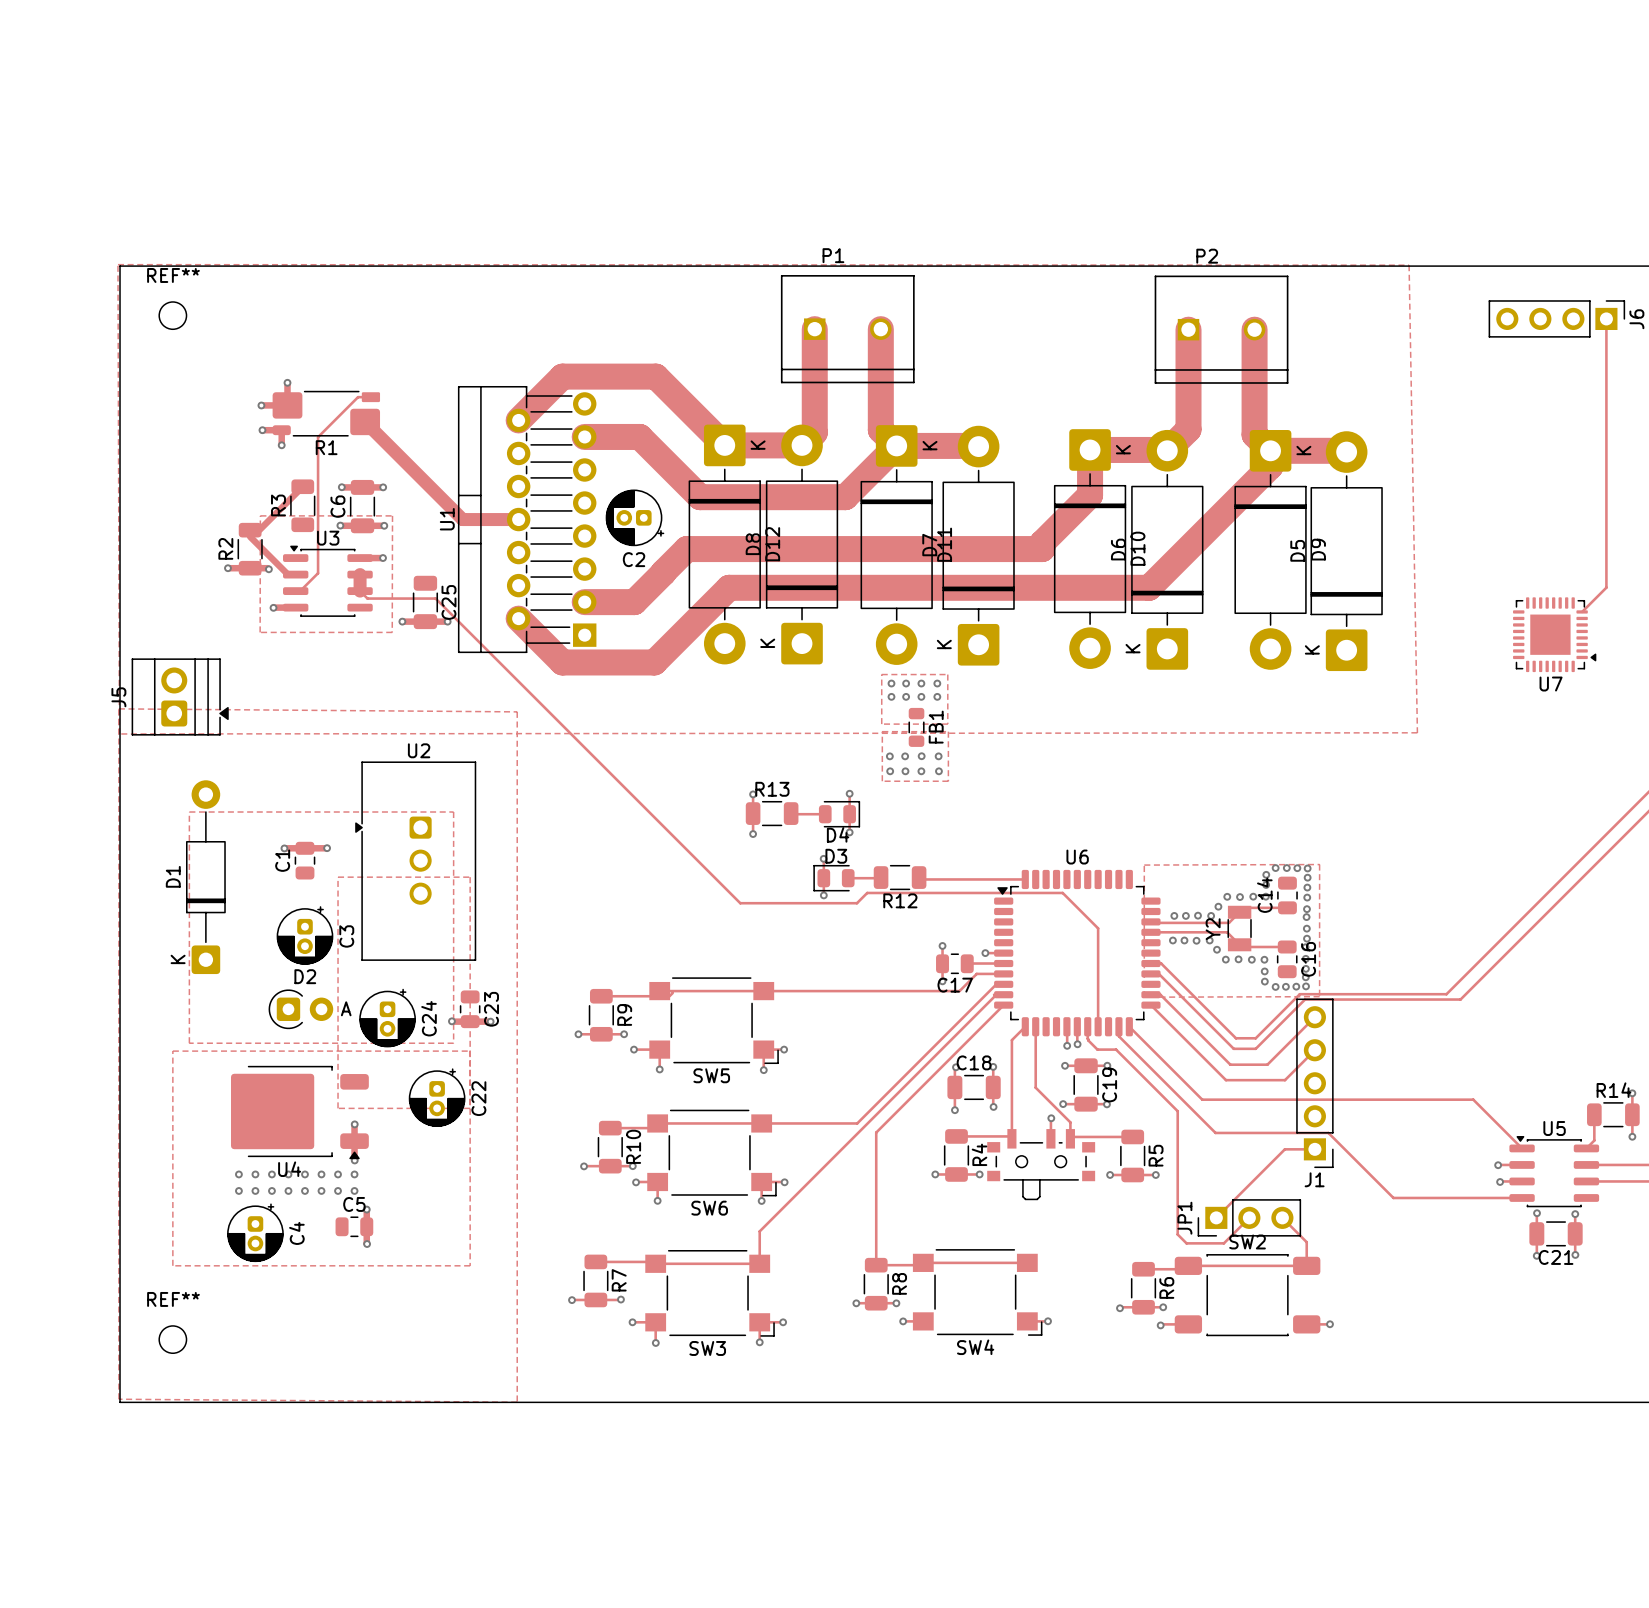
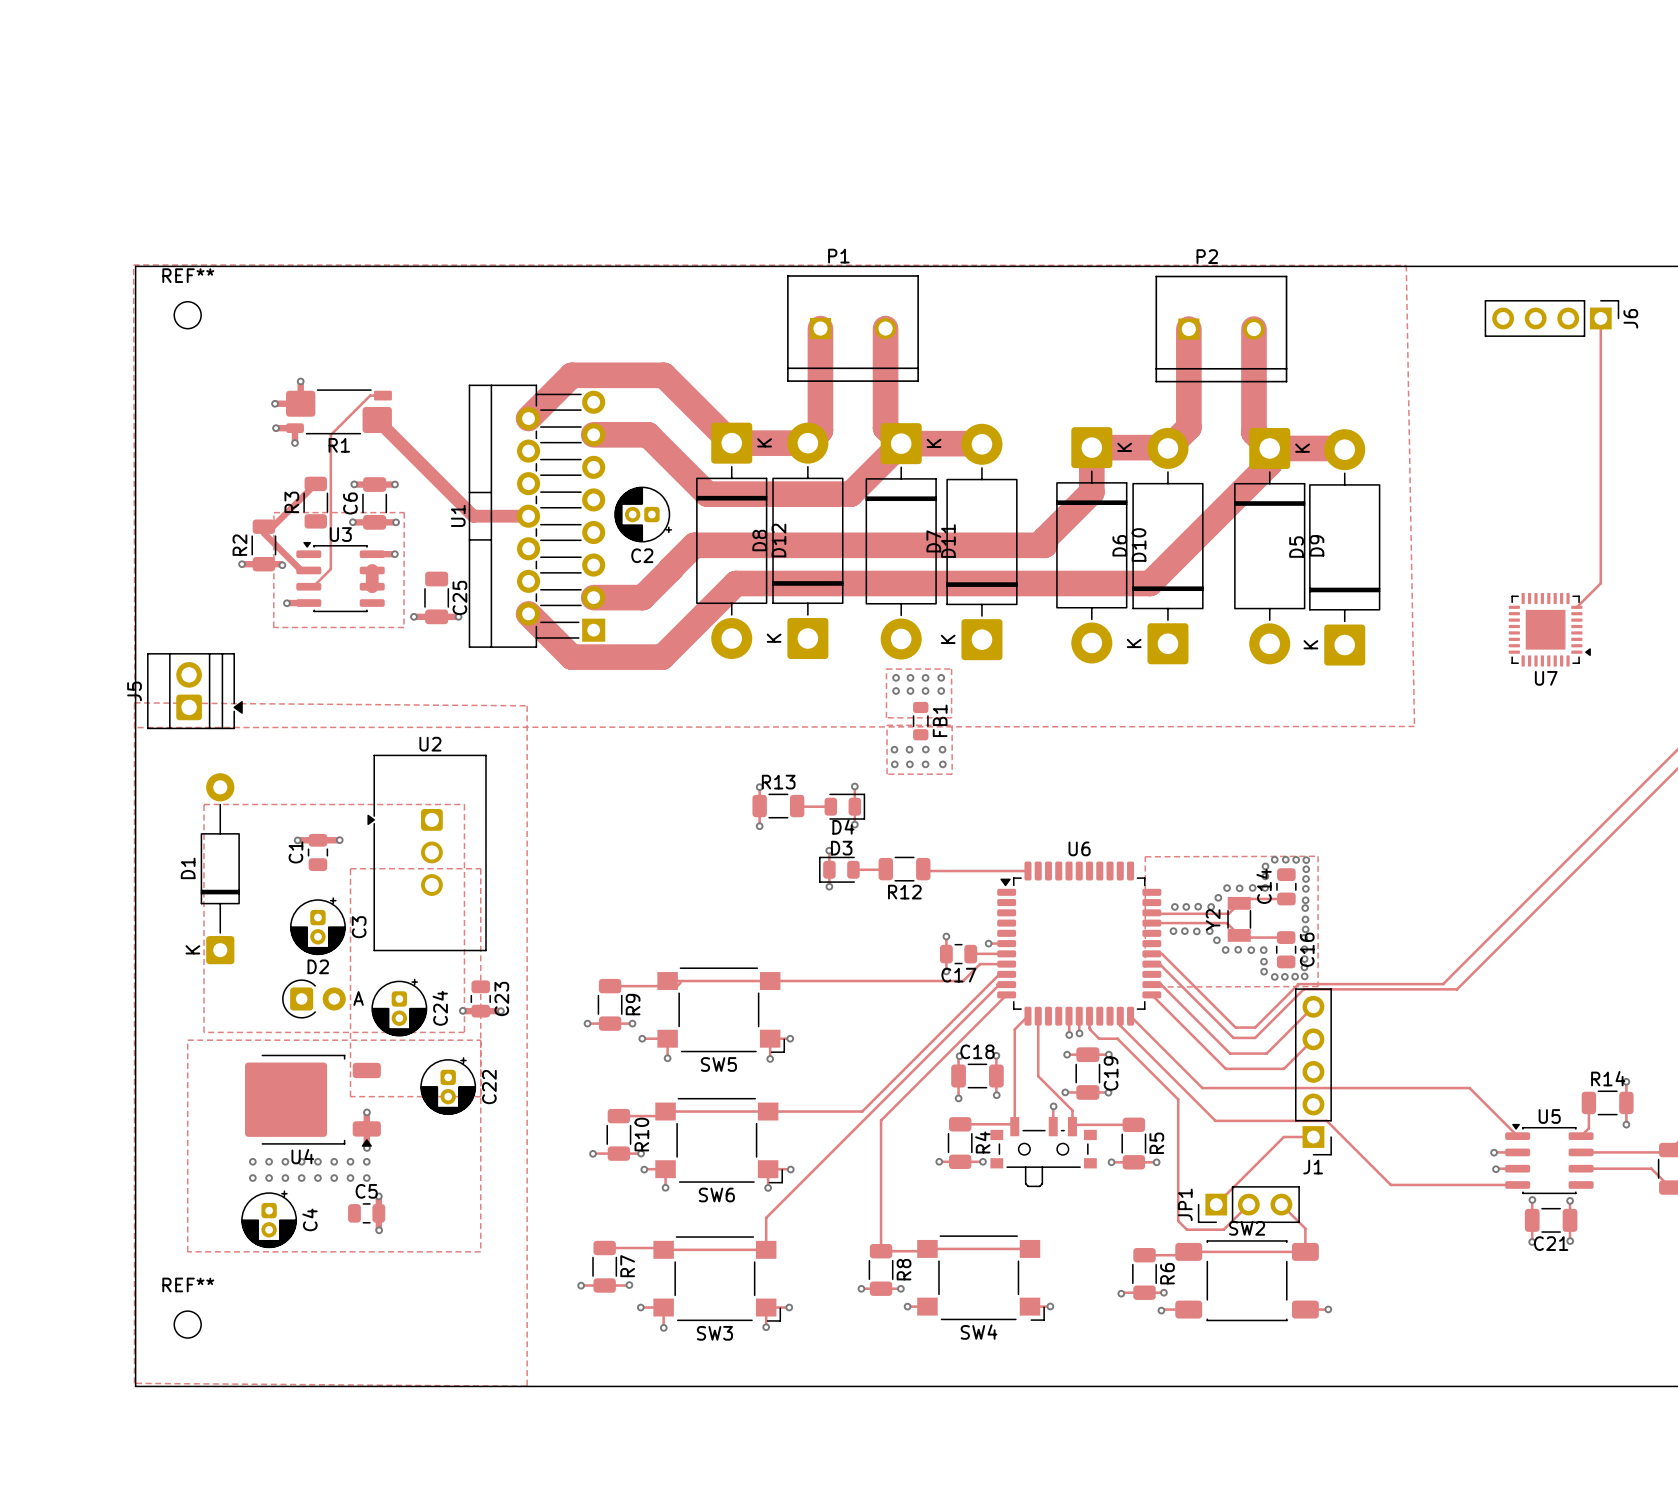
track: (360, 591) (367, 598) (435, 598) (740, 903) (856, 903) (867, 892) (1062, 892) (1098, 928) (1098, 1026) -> none

